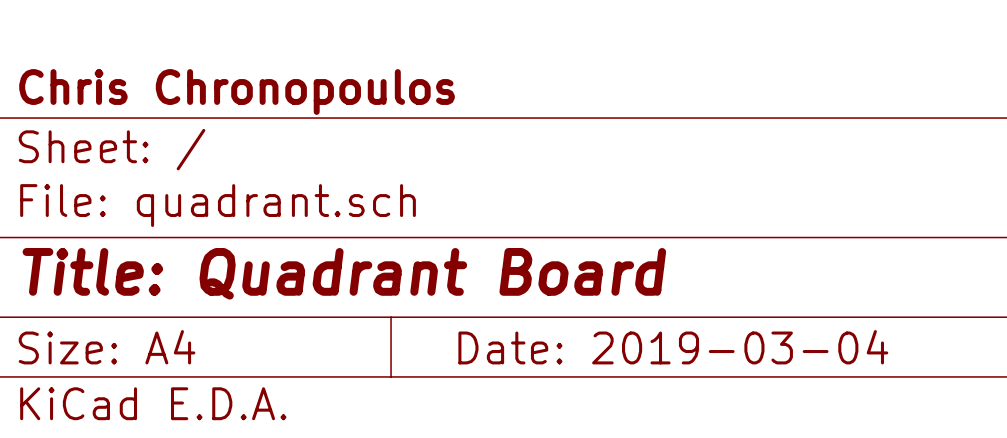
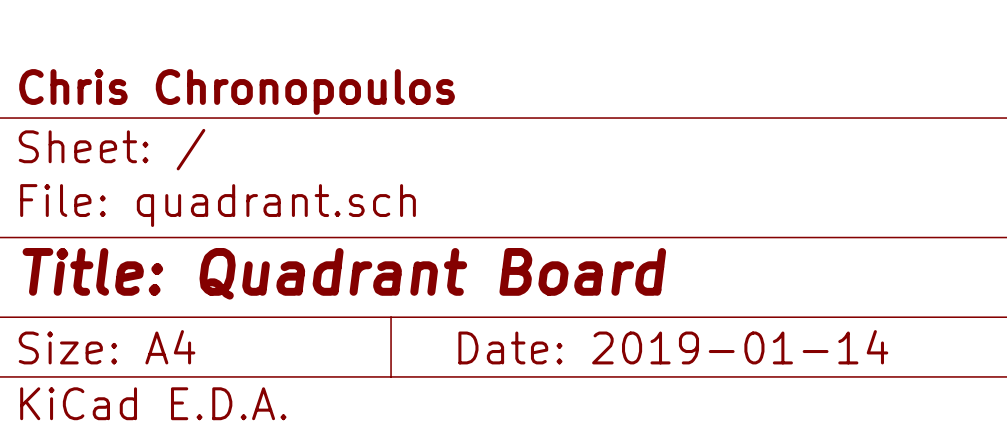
title block: Date: 2019-03-04 (673, 347) -> Date: 2019-01-14 (673, 347)

